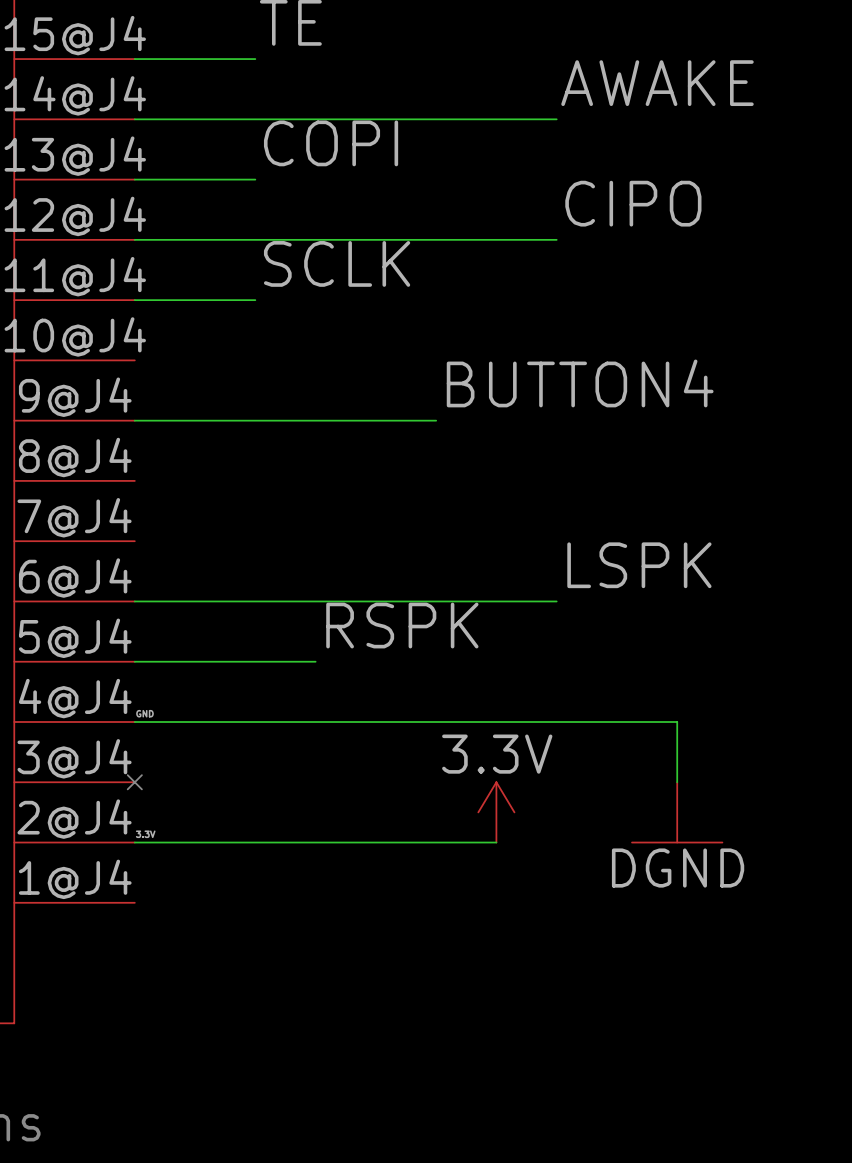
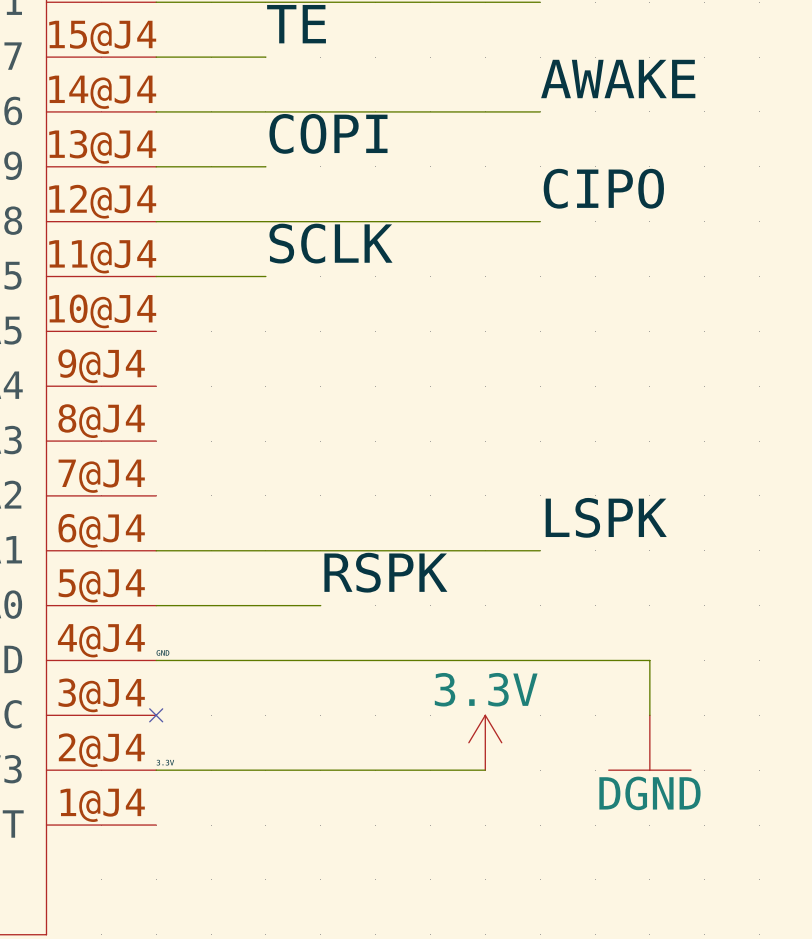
label: BUTTON4 (580, 383) -> none
wire: (134, 420) (436, 420) -> none

